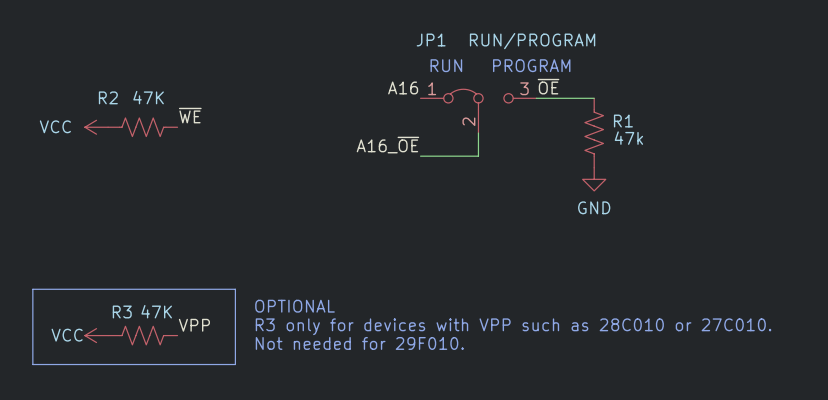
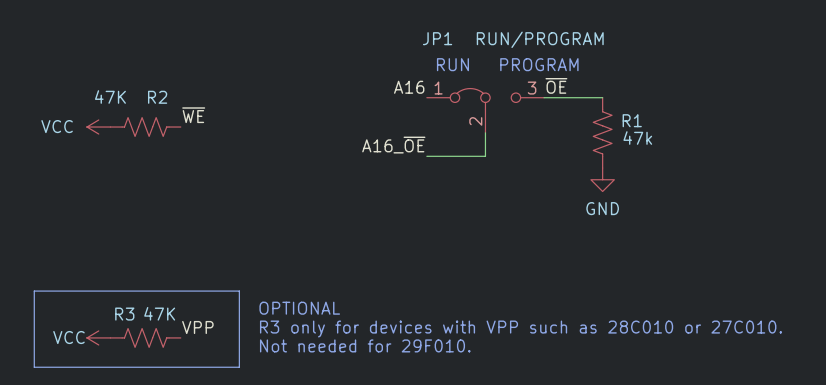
R2 name position: R2 (108, 97) -> R2 (157, 97)
R2 value position: 47K (148, 97) -> 47K (110, 97)

